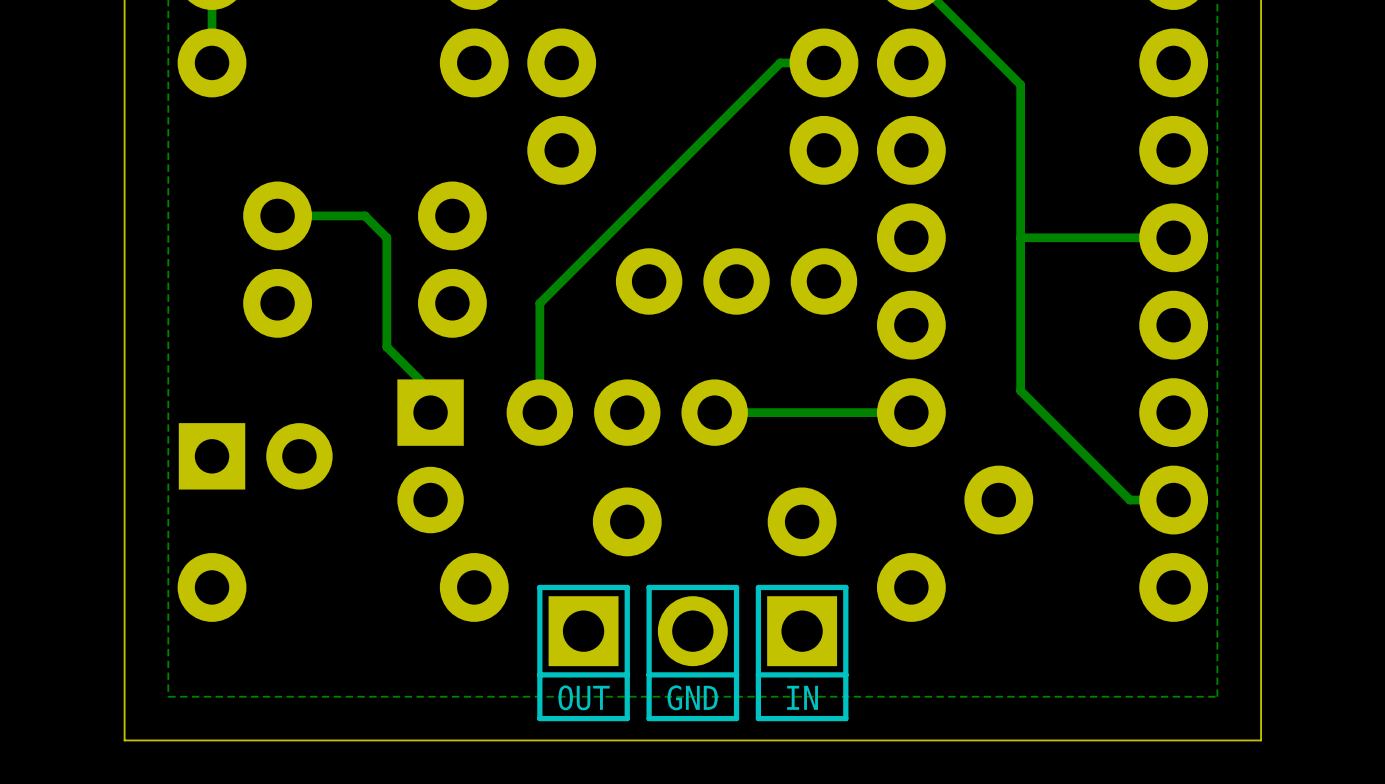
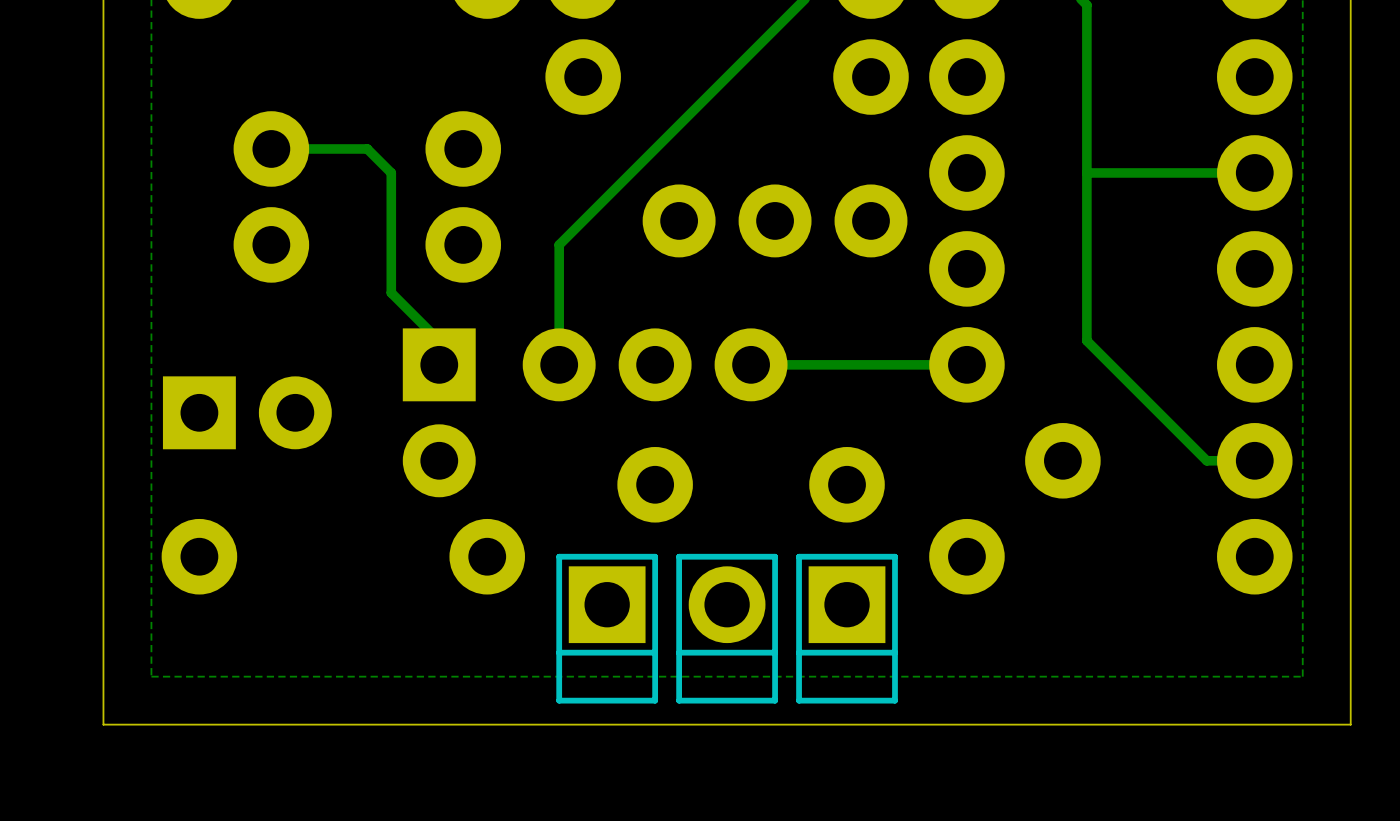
OUT name: OUT (584, 697) -> none
GND name: GND (692, 697) -> none
IN name: IN (802, 697) -> none

